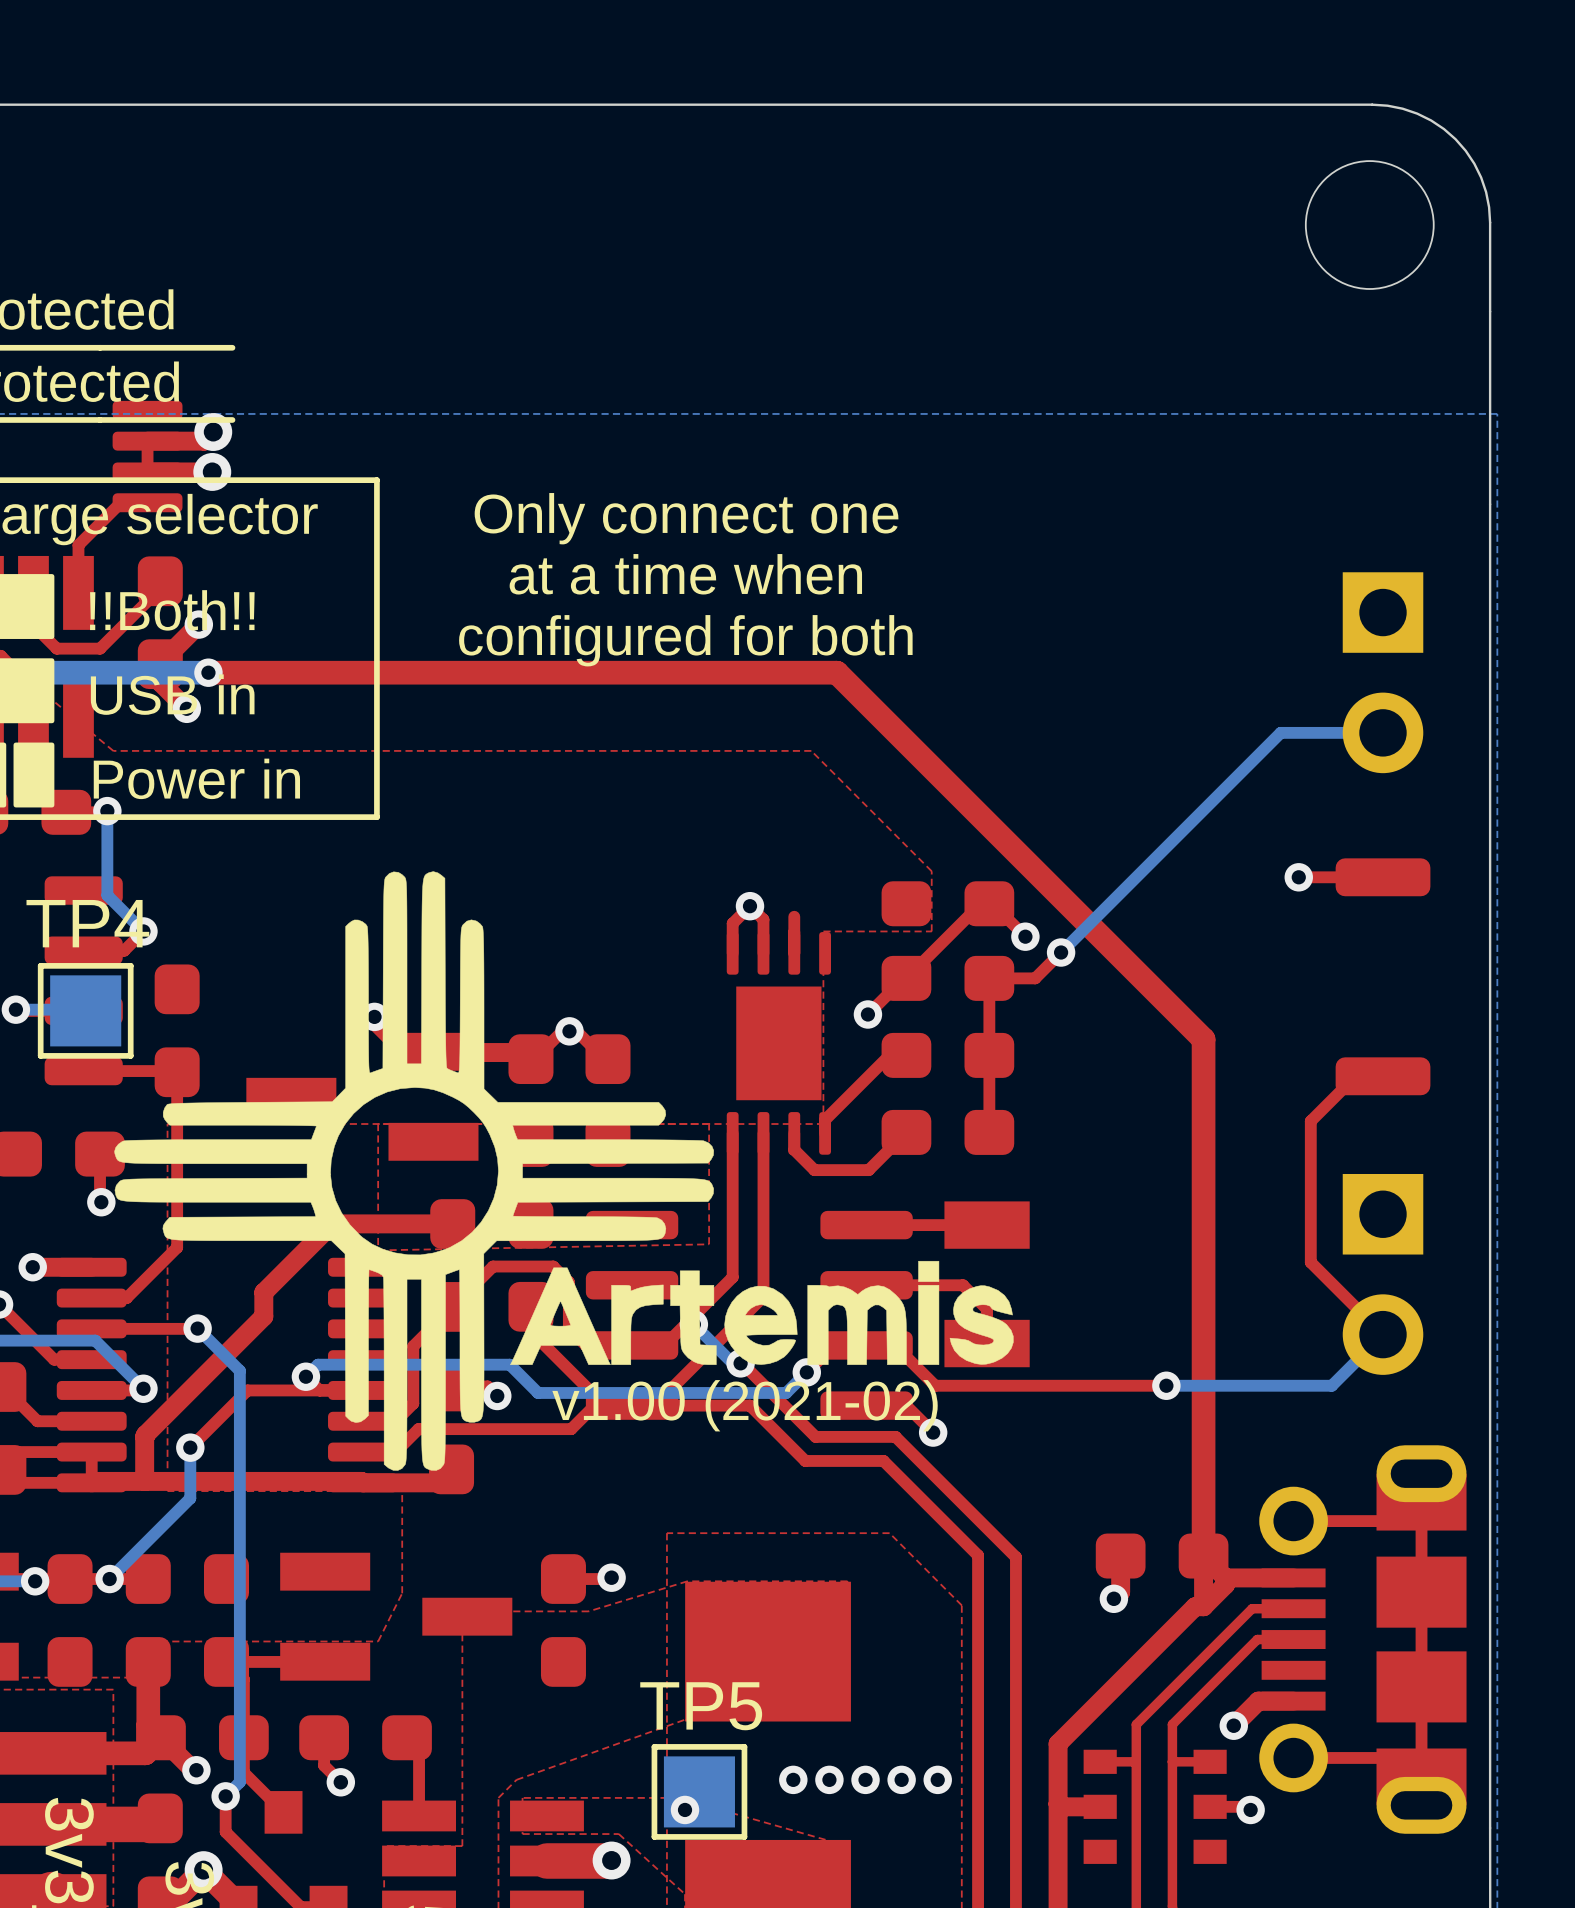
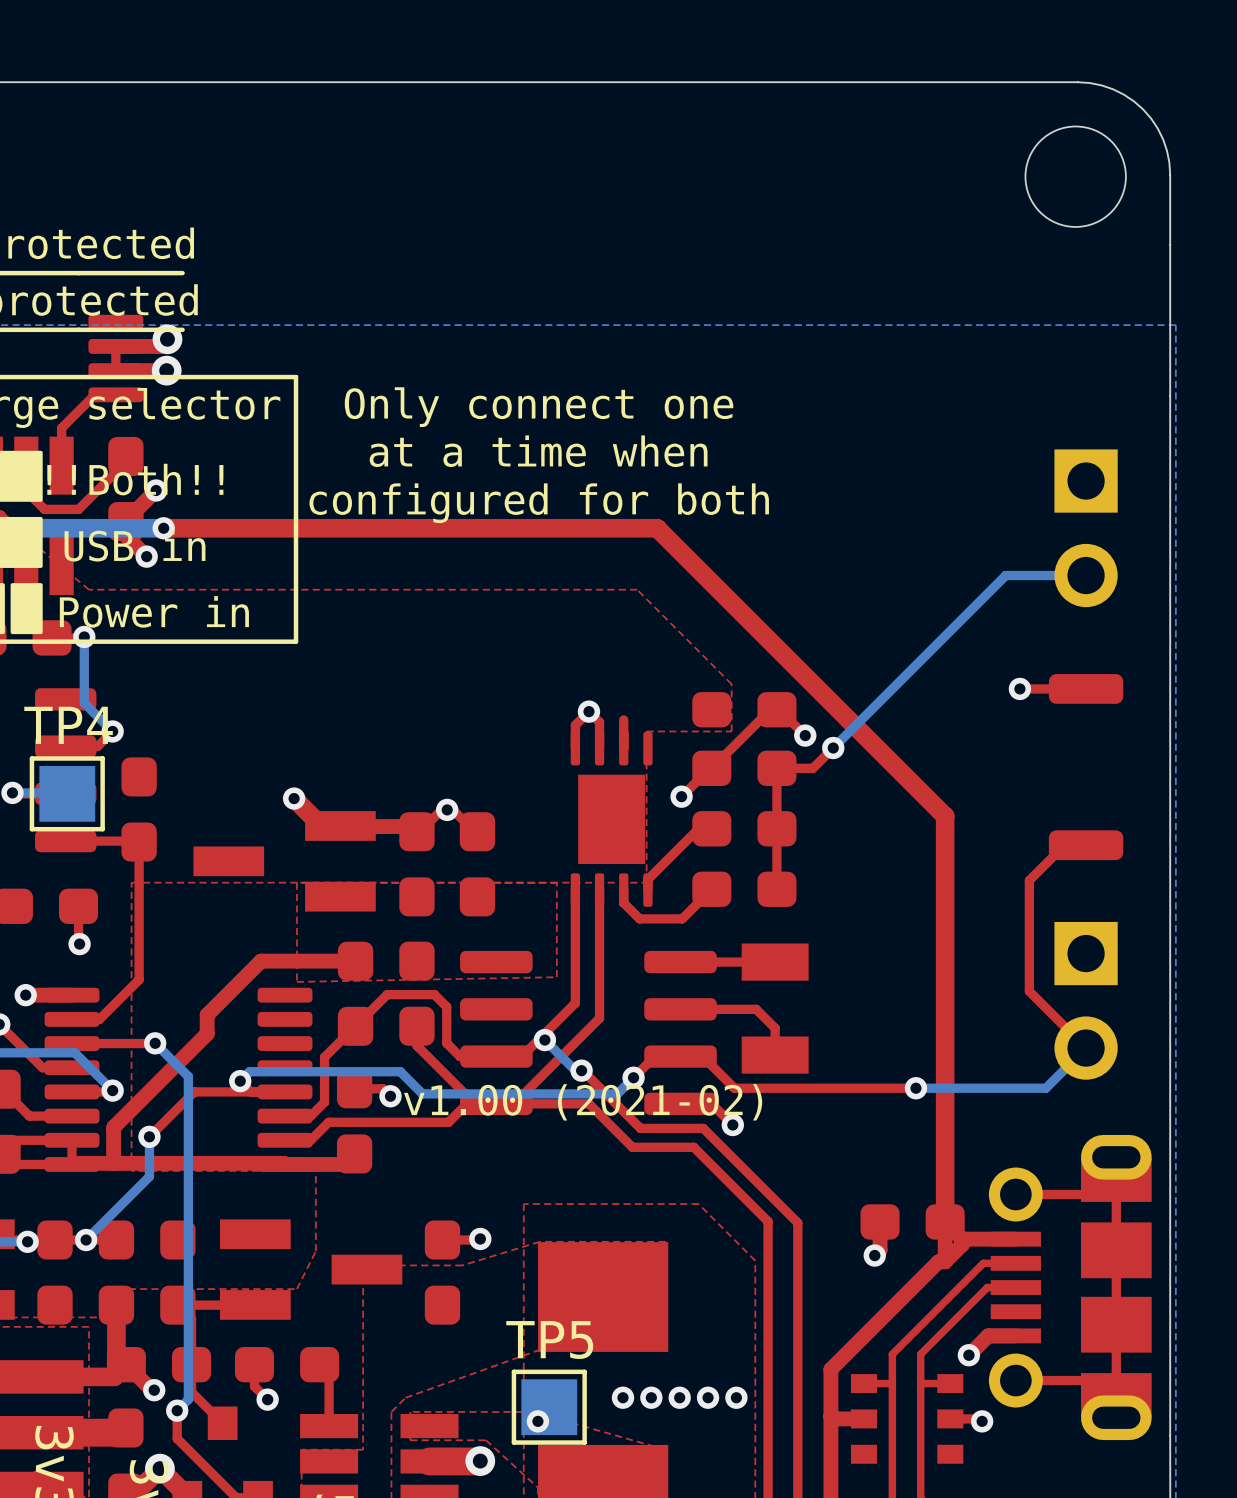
drawing: [114, 871, 1014, 1471] -> none

